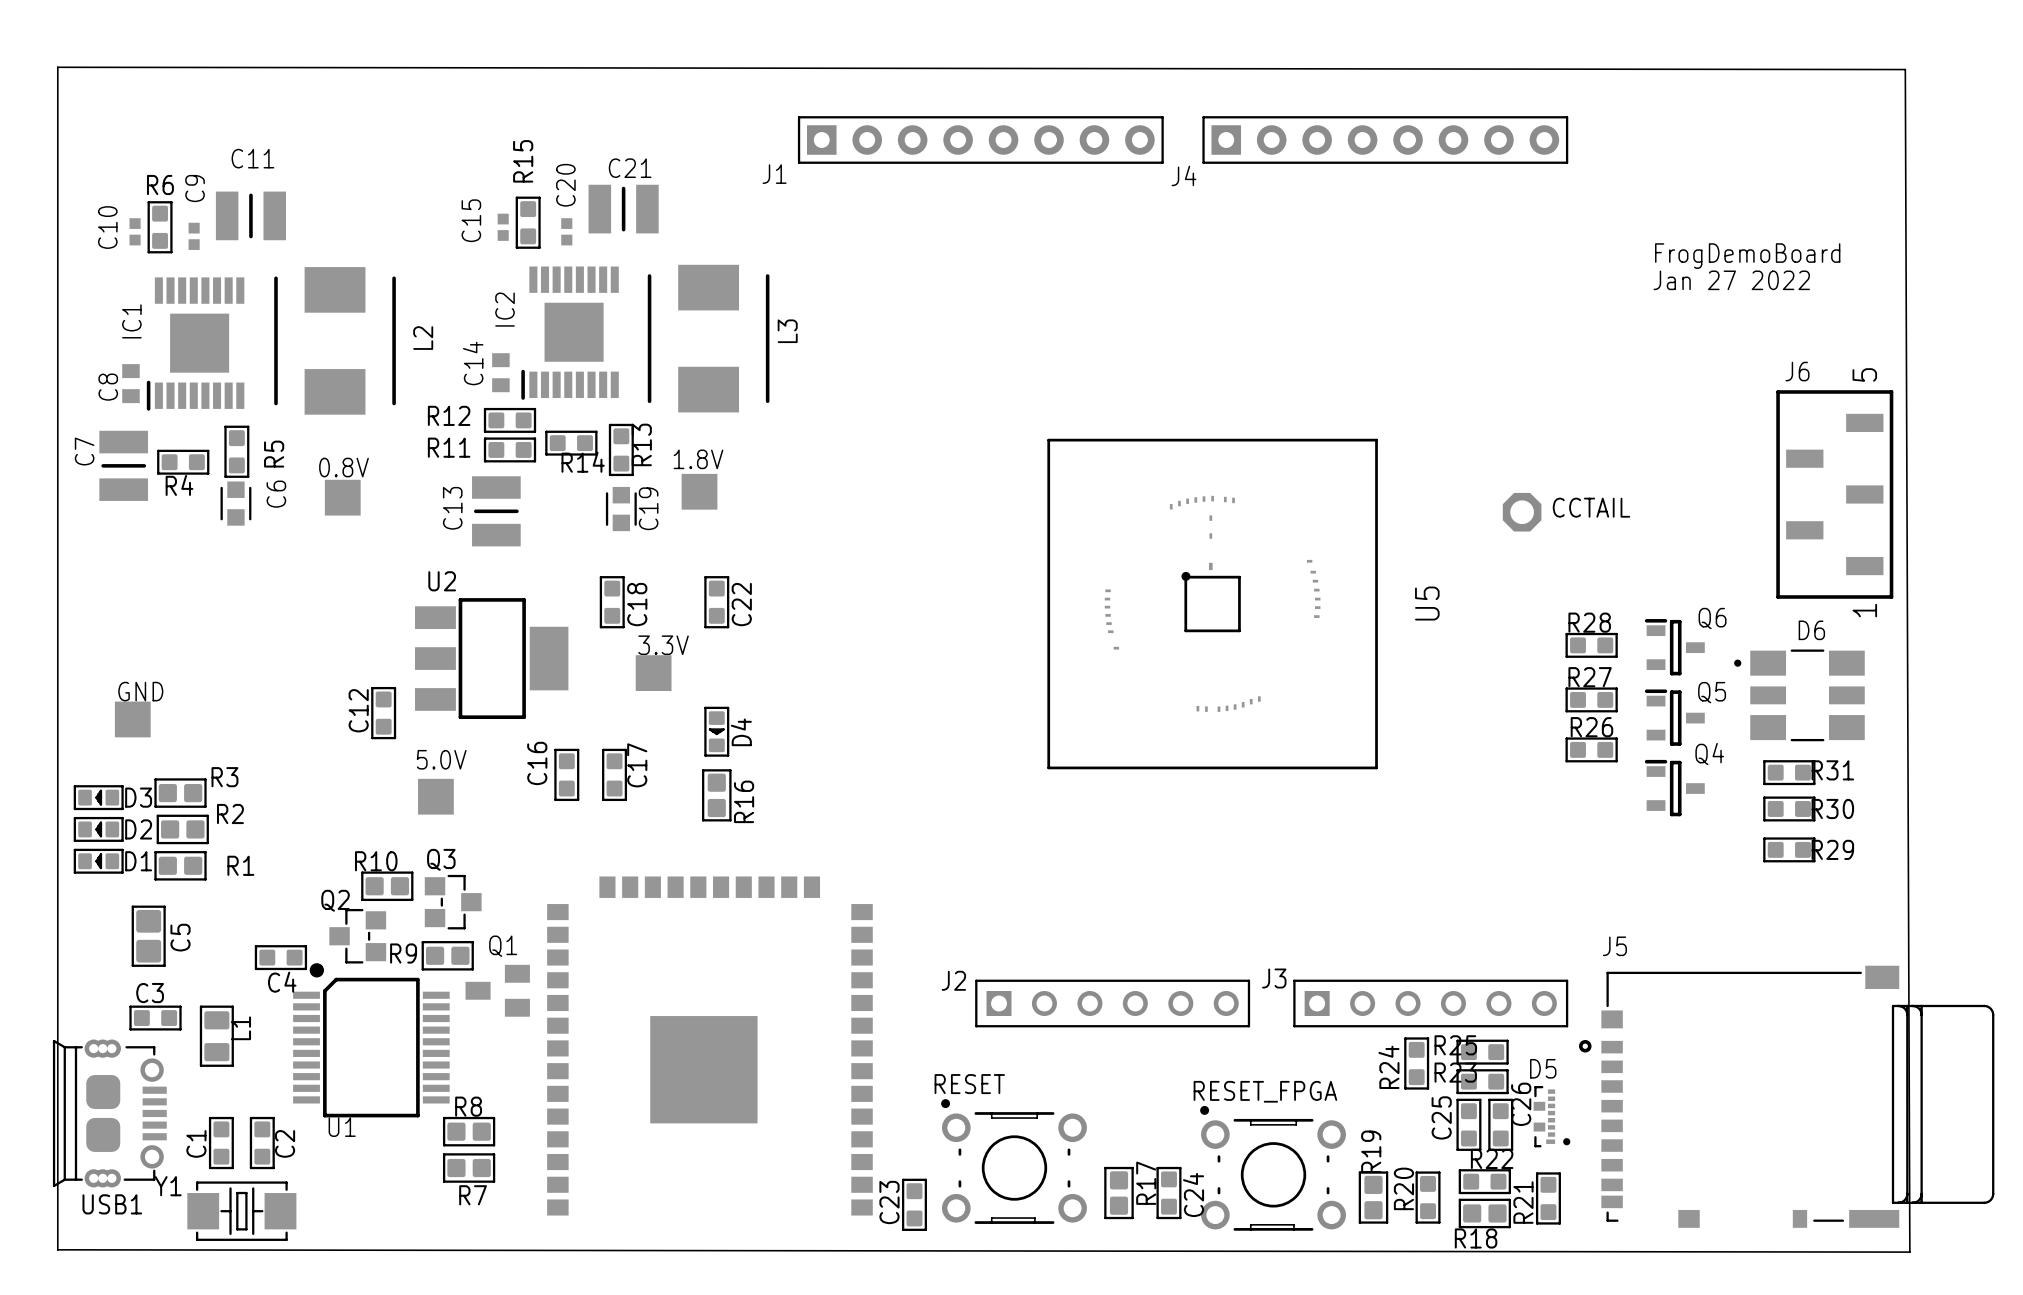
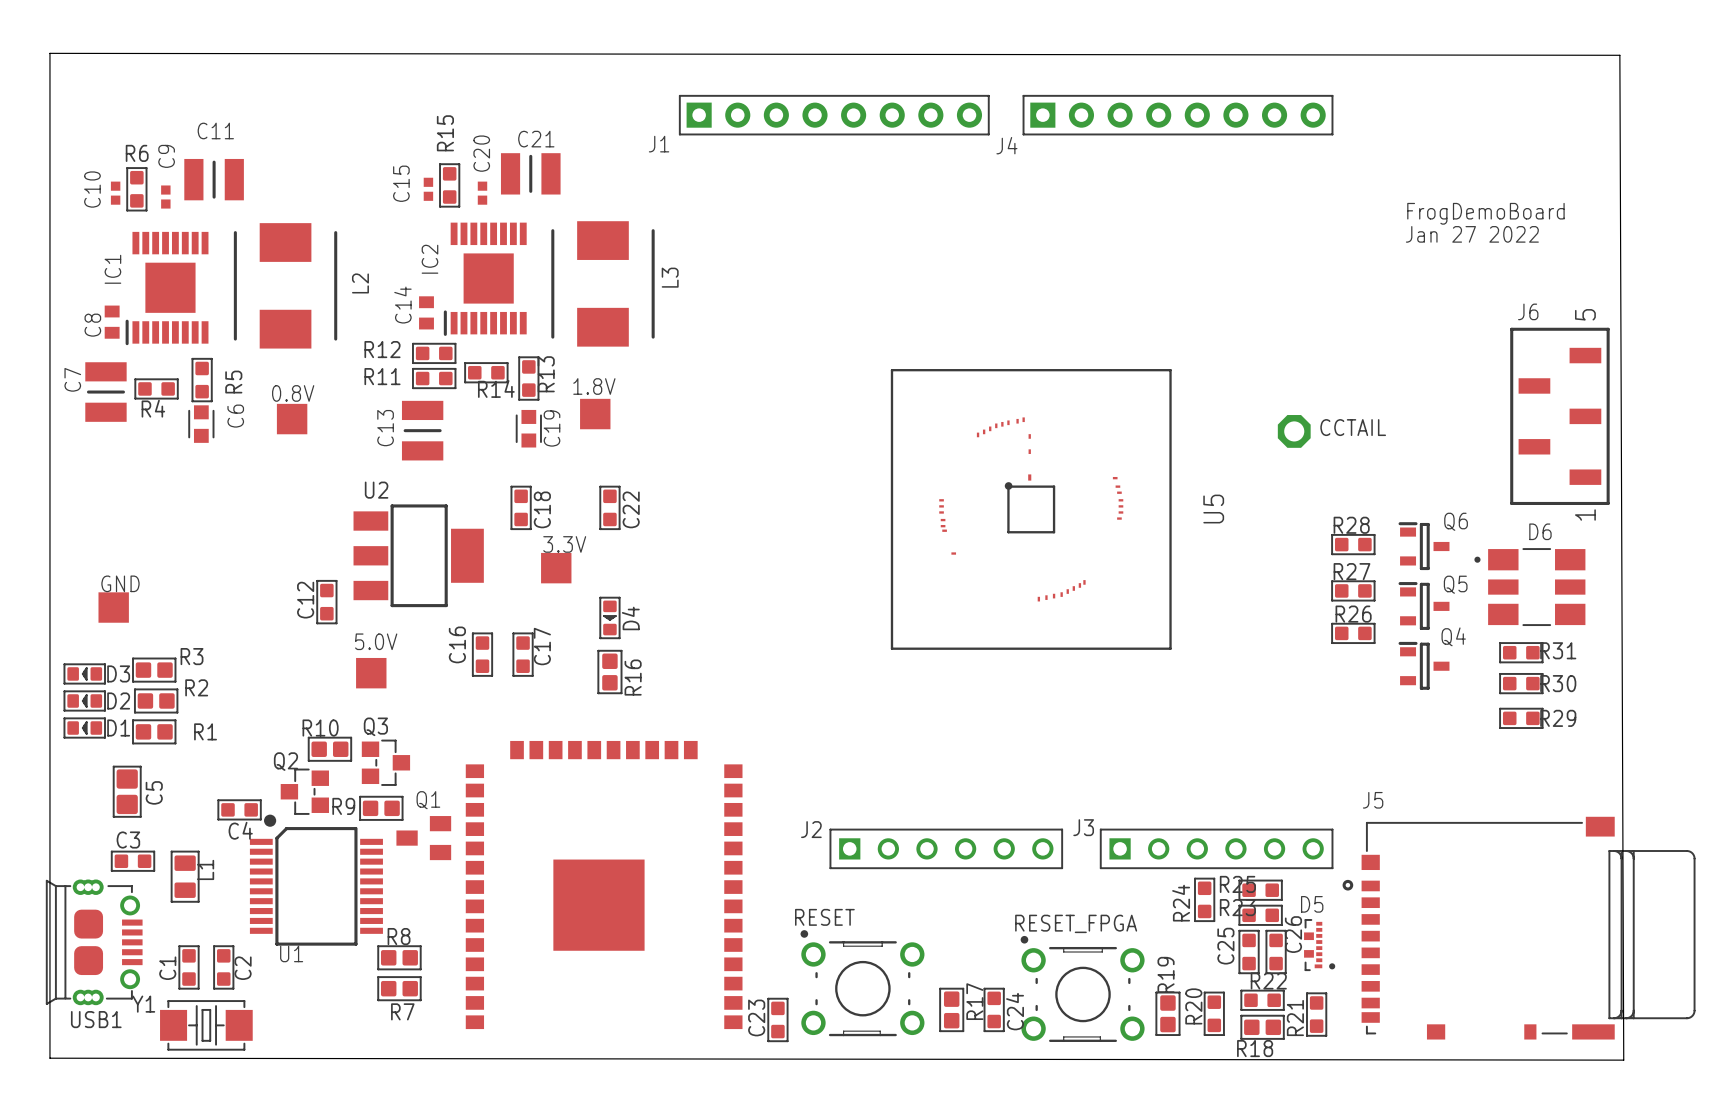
U5 footprint: [1047, 438, 1378, 770] -> [890, 369, 1172, 650]

